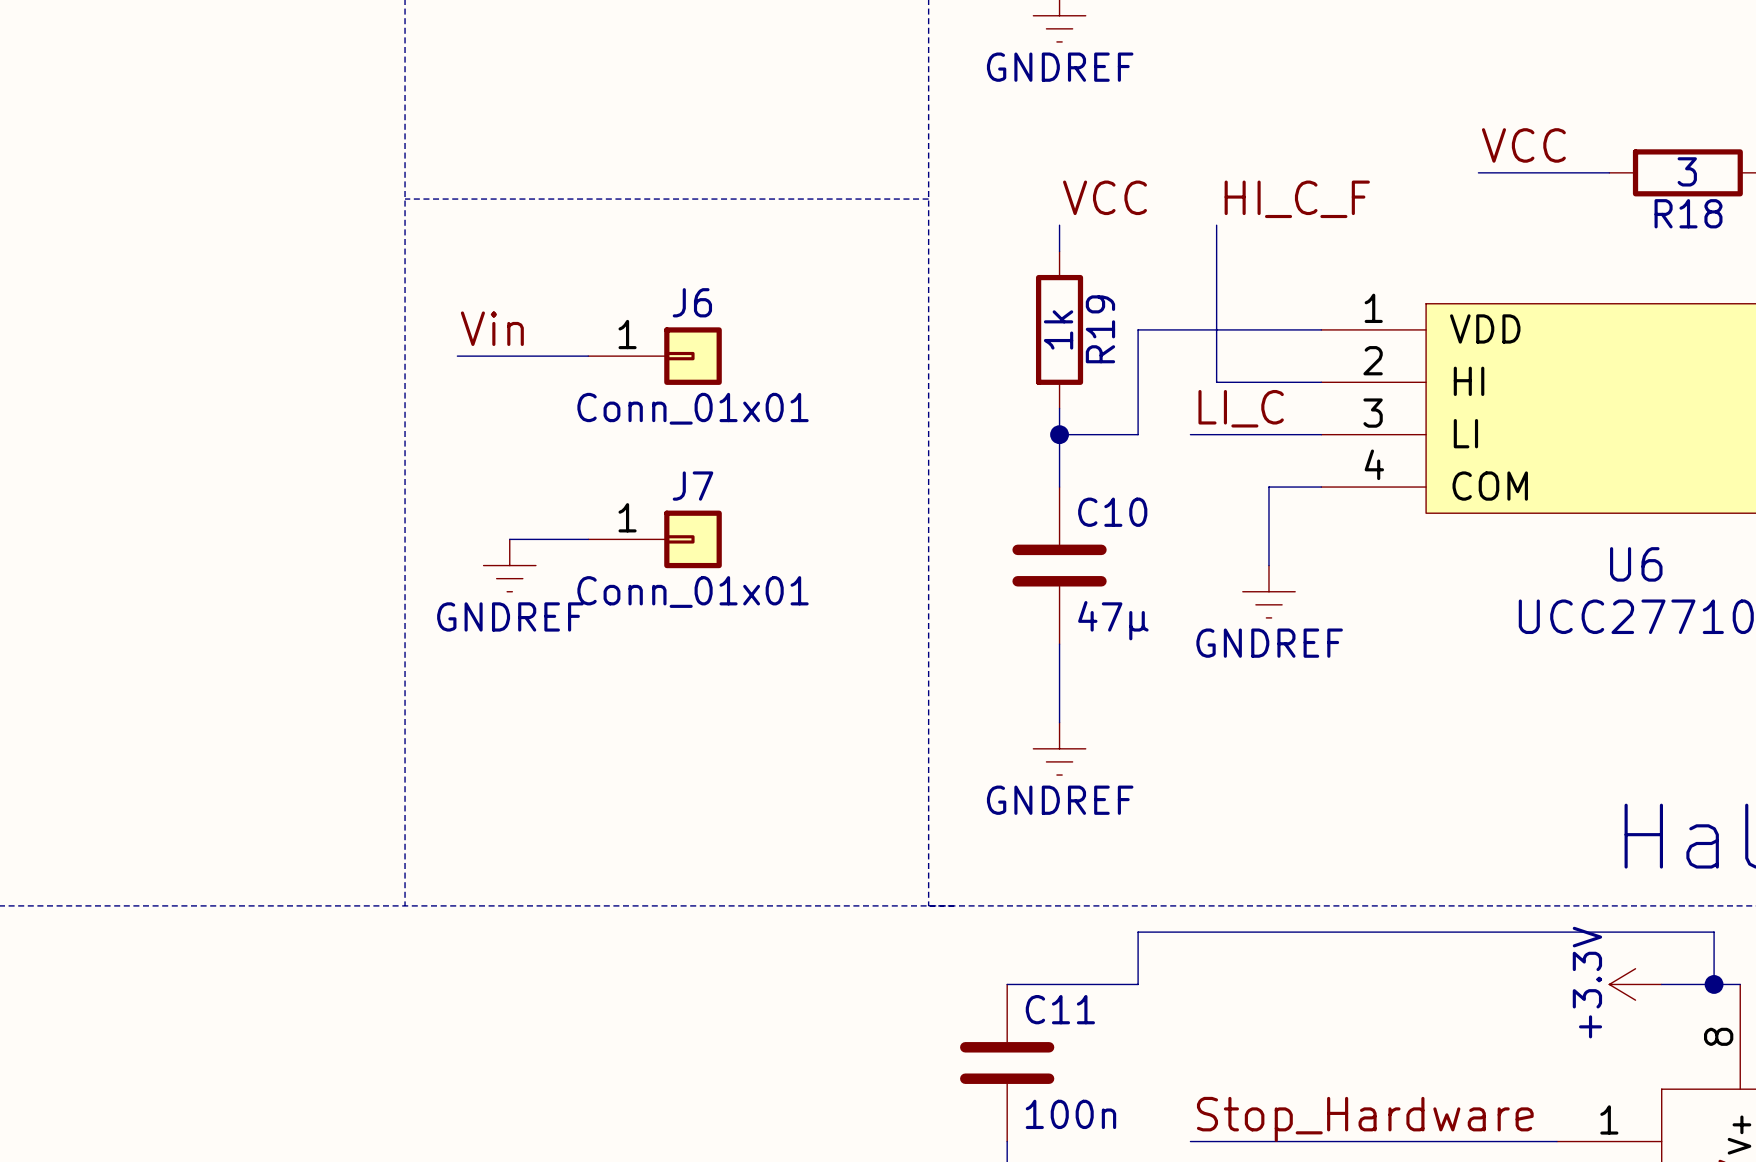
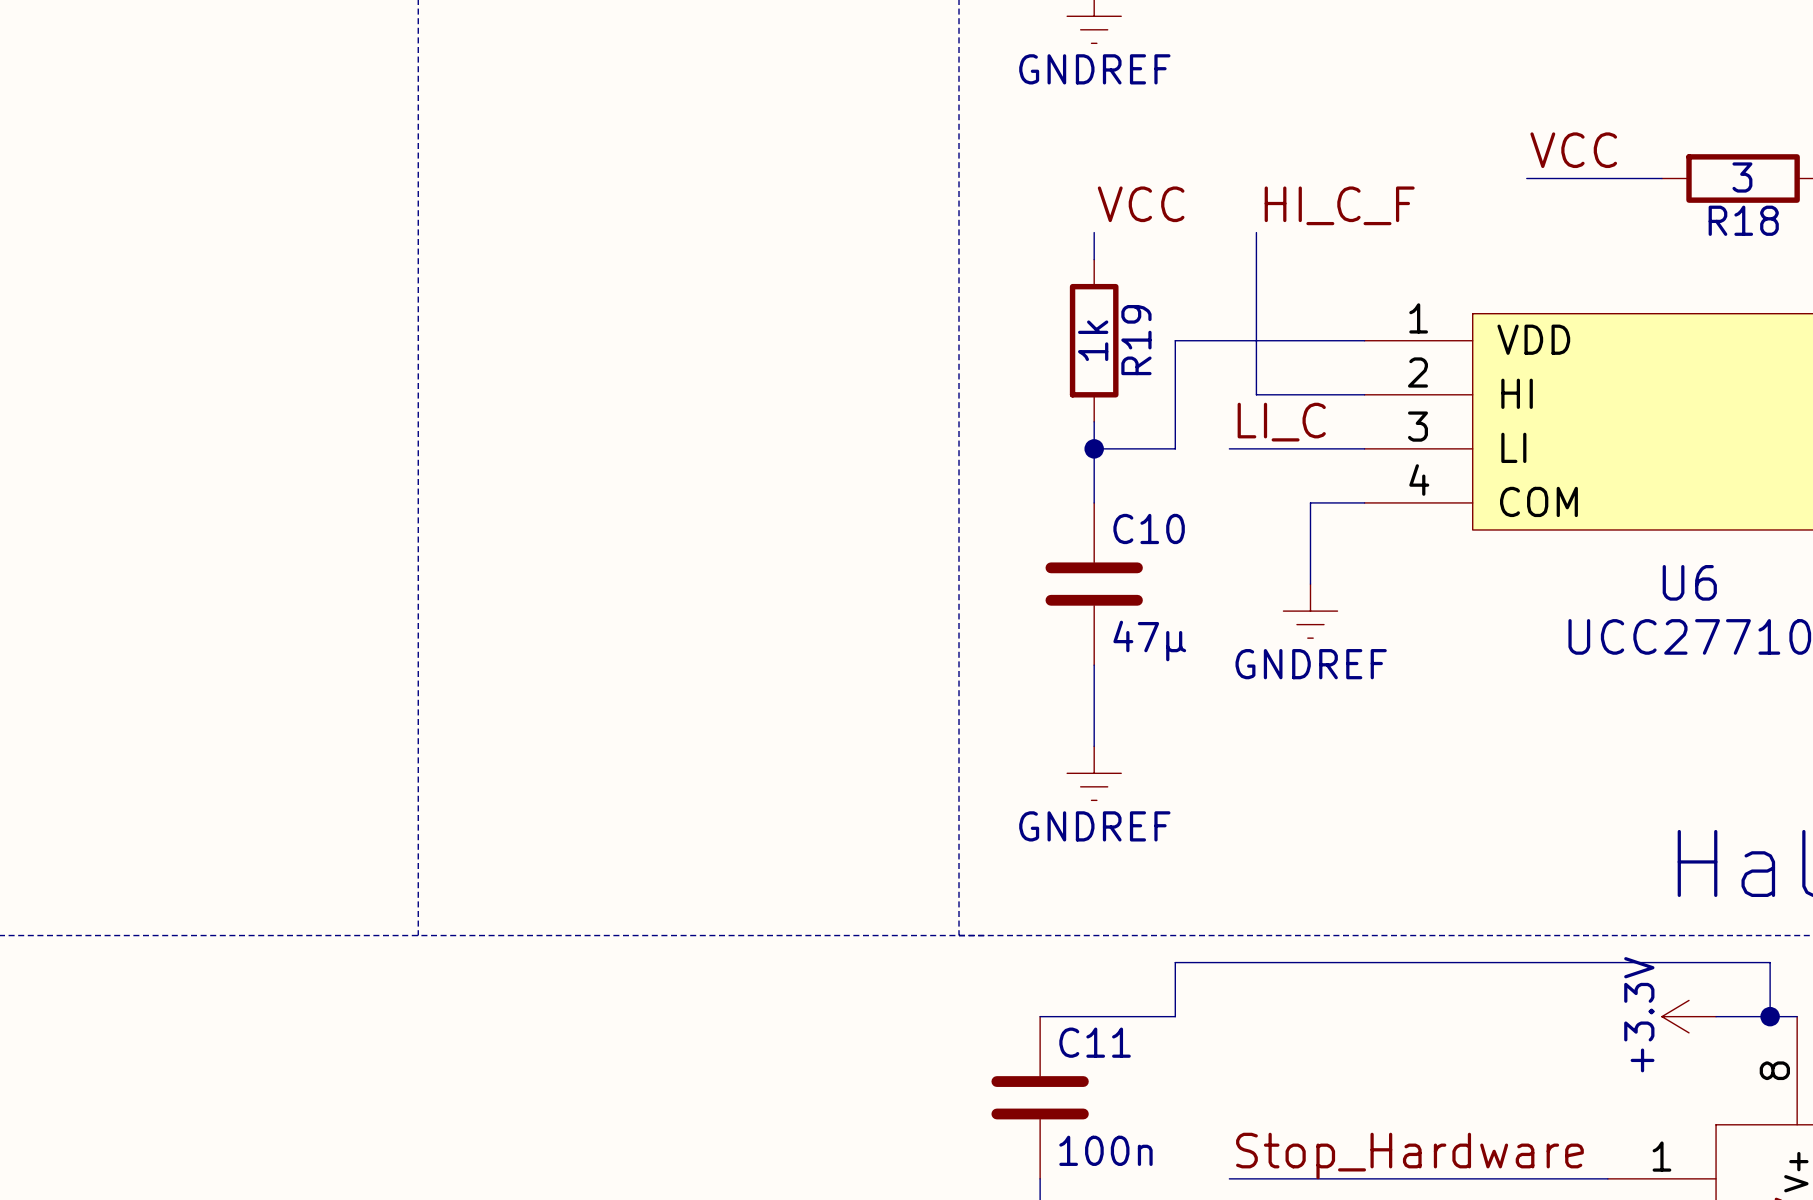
line: (405, 199) (928, 199) -> none
label: Vin (492, 328) -> none
wire: (457, 356) (588, 356) -> none
J6: Conn_01x01 (655, 356) -> none
wire: (509, 539) (588, 539) -> none
J7: Conn_01x01 (655, 539) -> none
power symbol: GNDREF (509, 565) -> none

